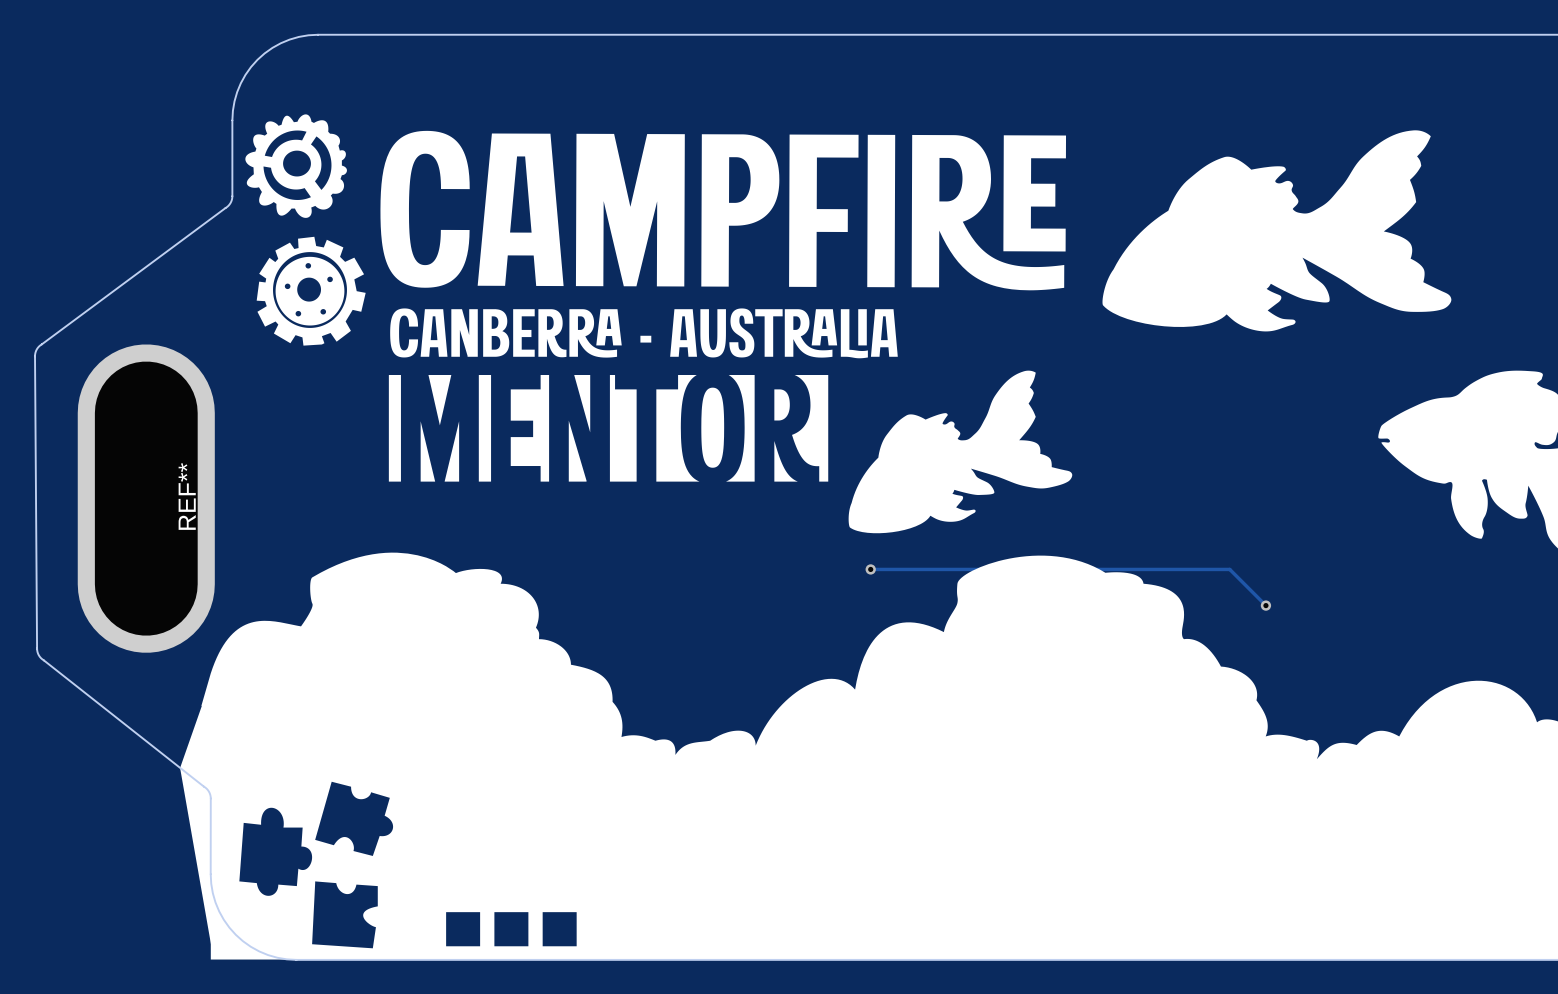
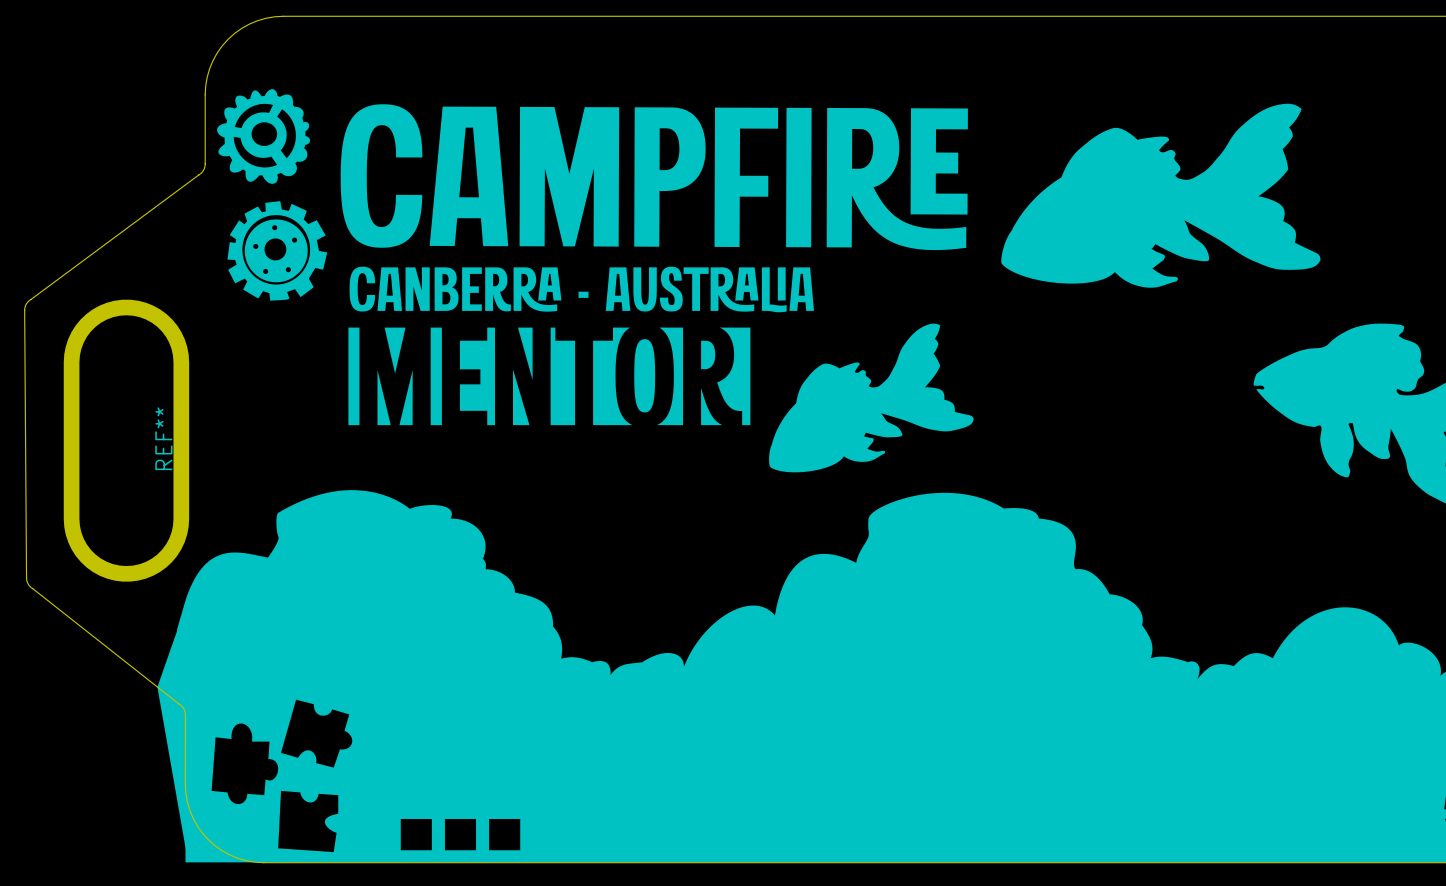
track: (870, 569) (1229, 569) (1265, 605) -> none
via: (870, 569) -> none
via: (1265, 605) -> none

